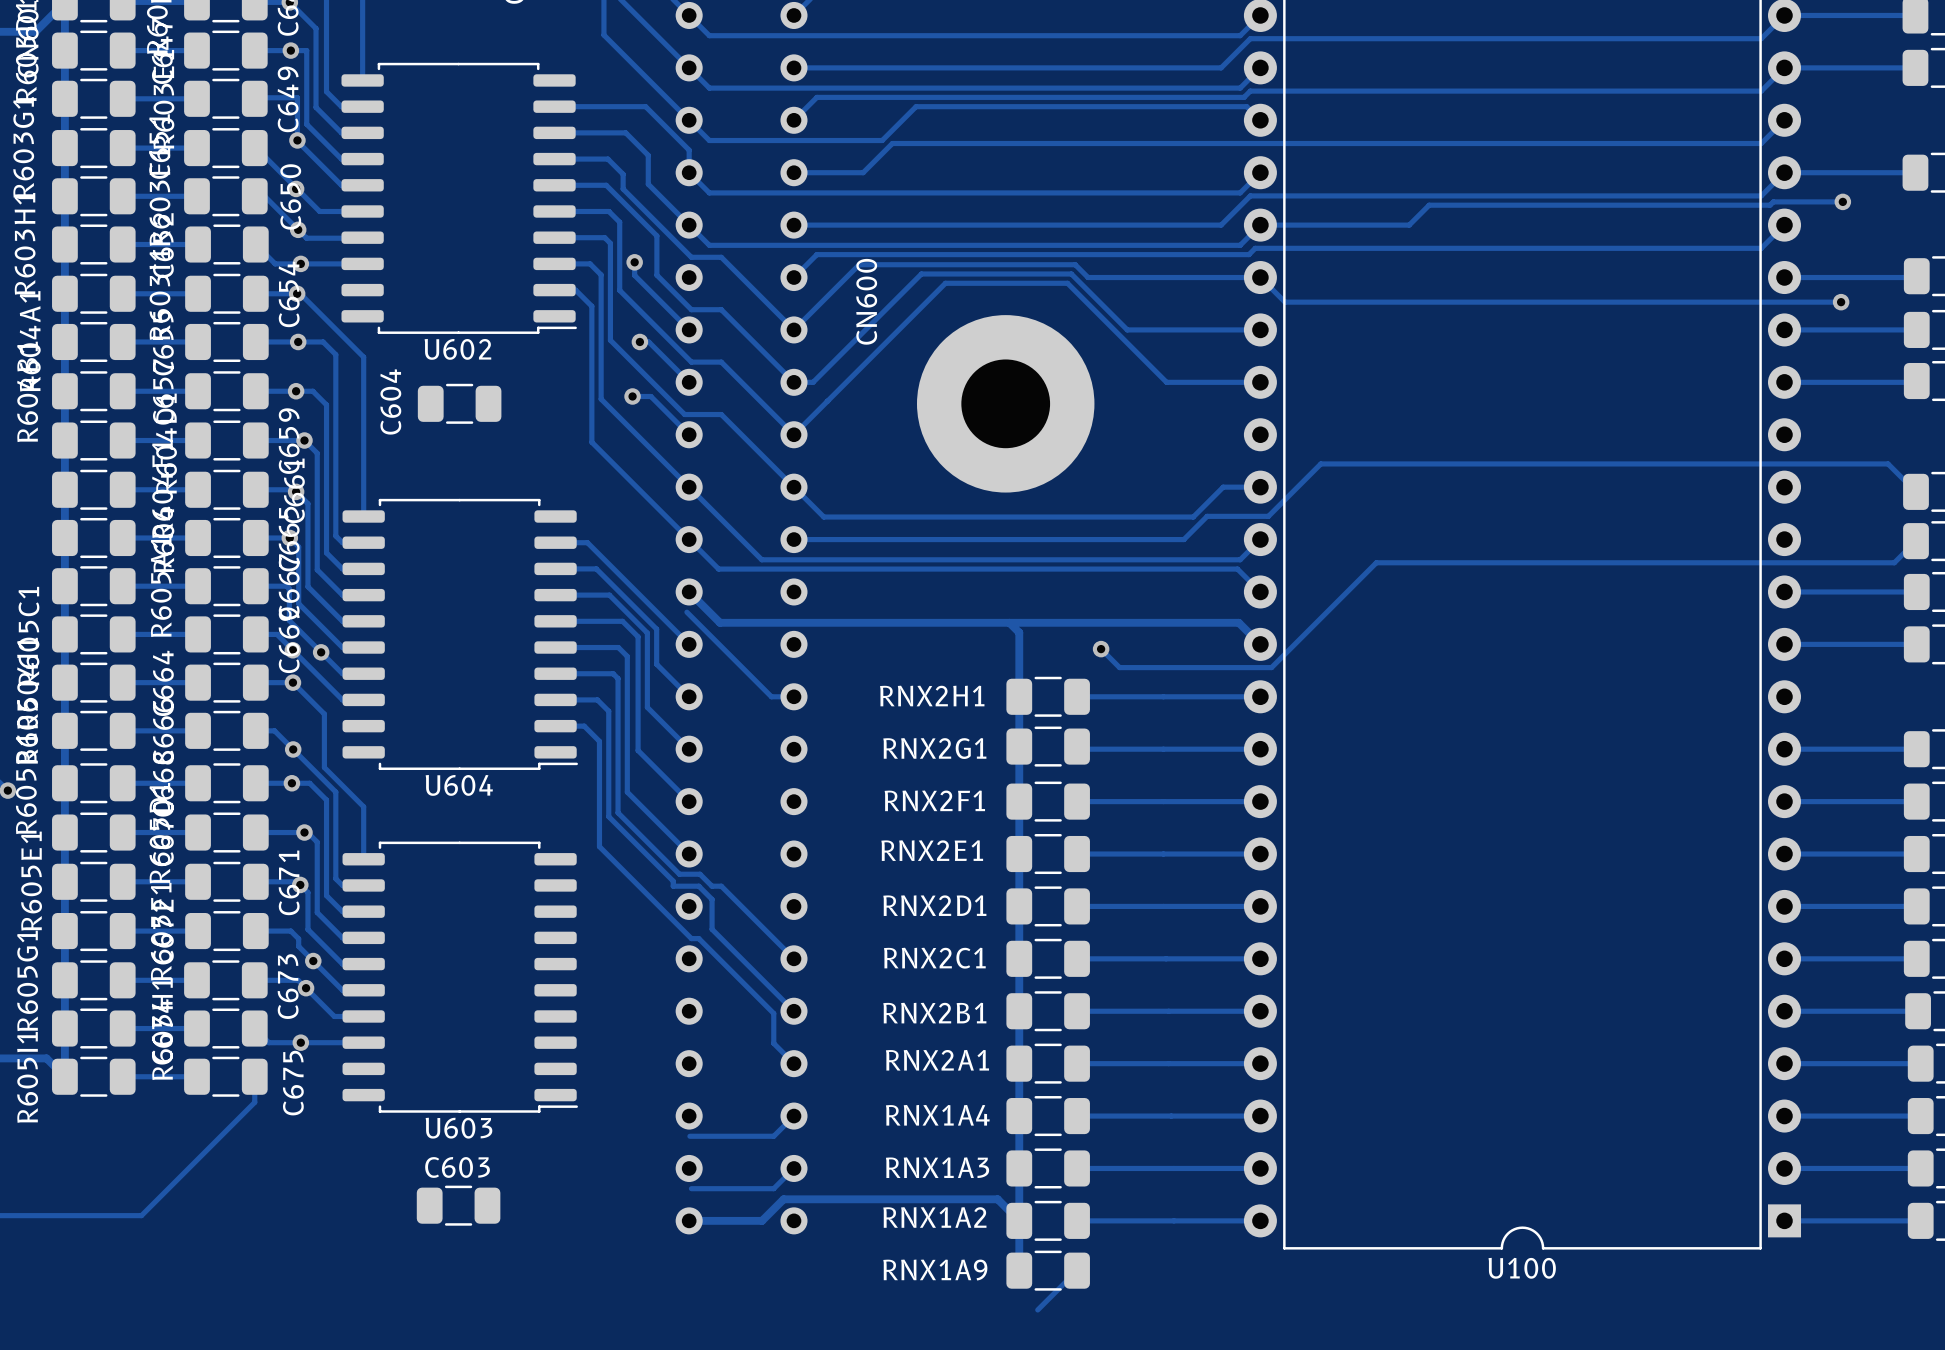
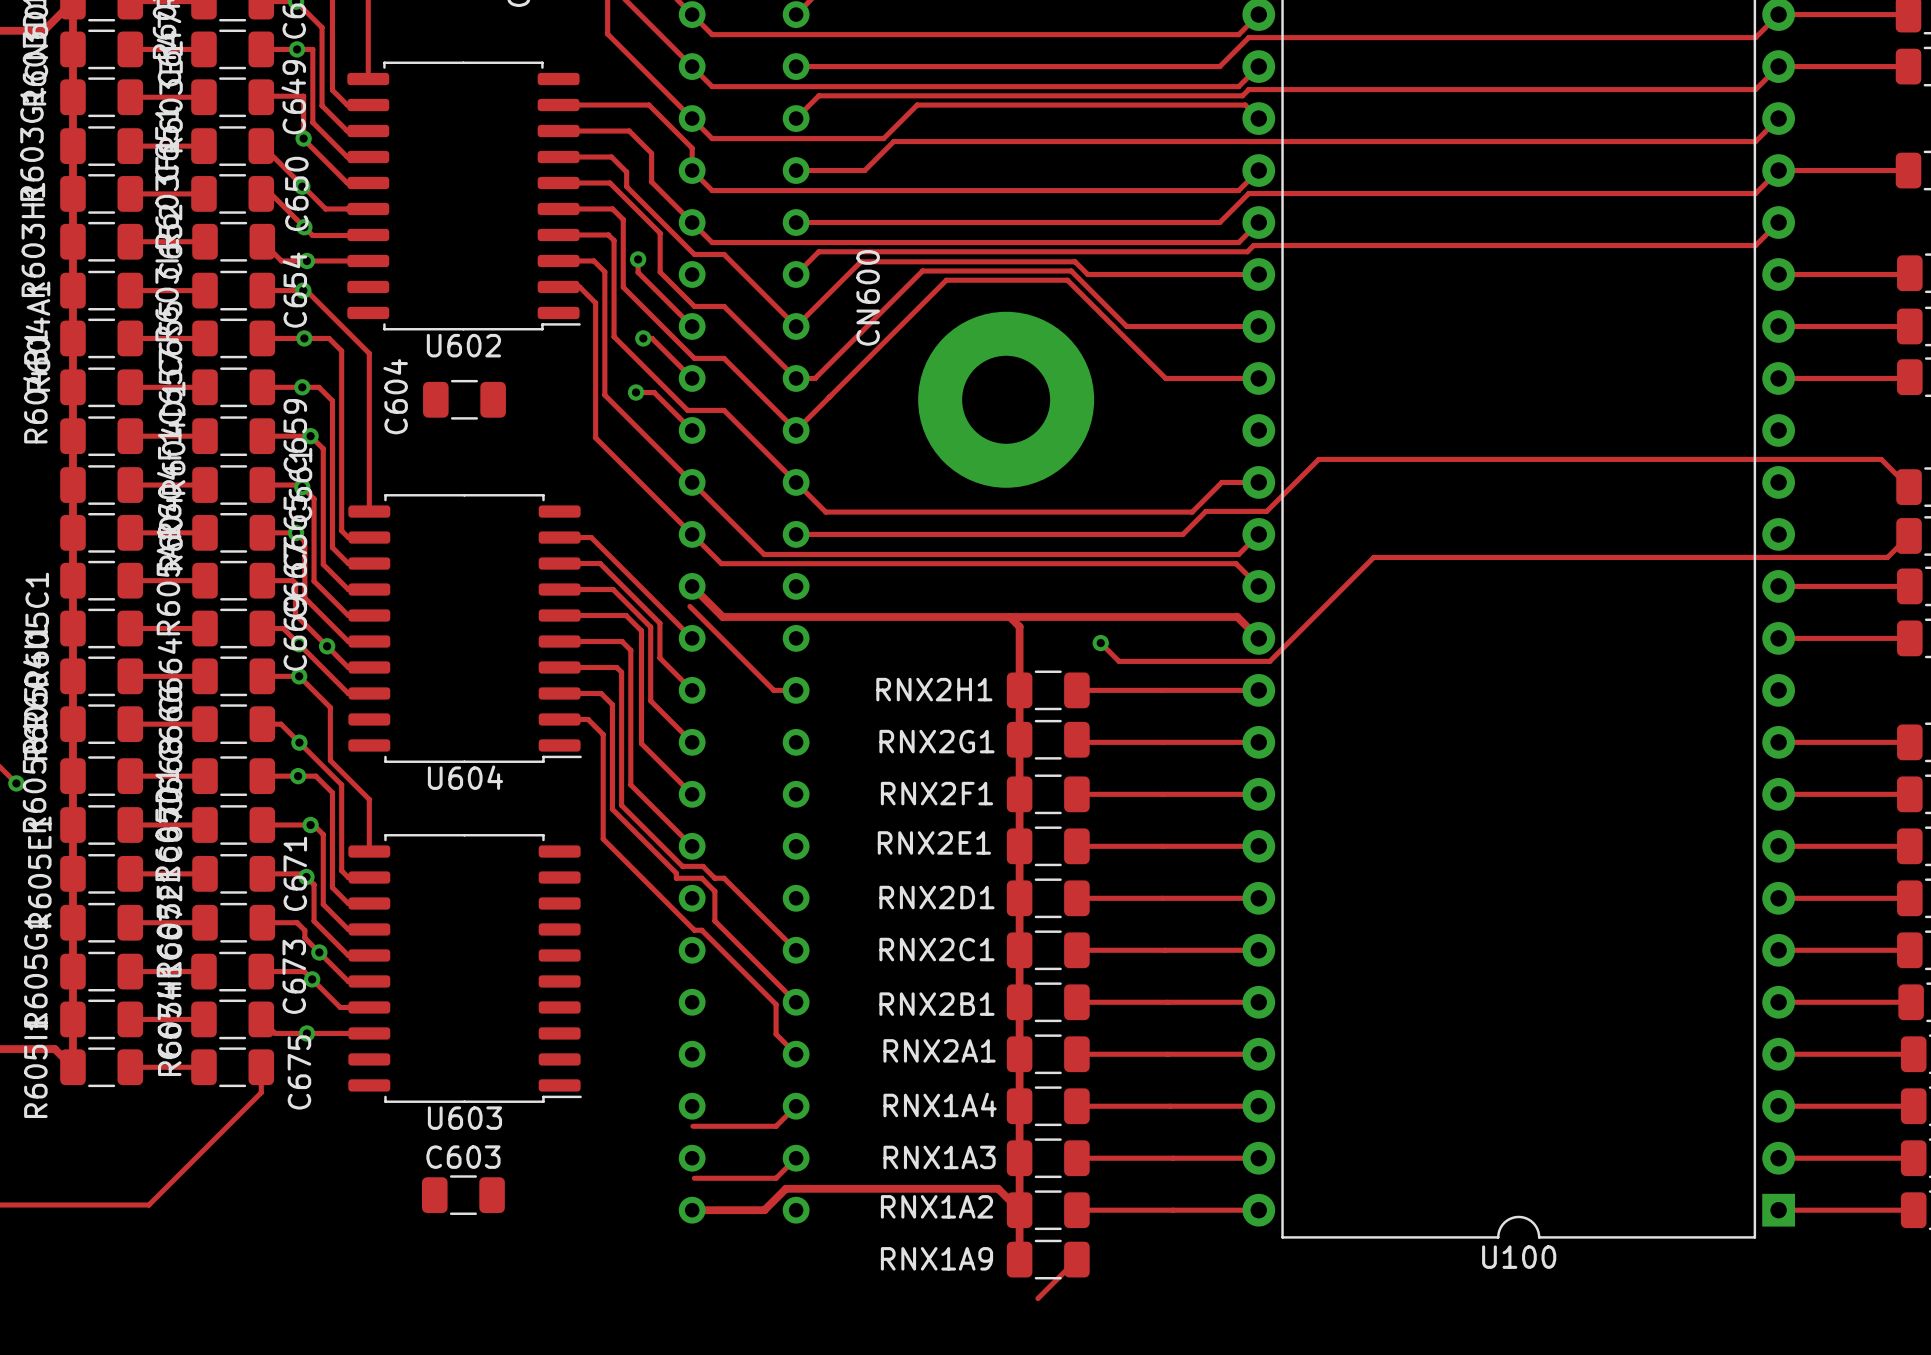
track: (1842, 201) (1773, 201) (1770, 205) (1429, 205) (1409, 225) (1260, 225) -> none
via: (1842, 201) -> none
track: (1260, 277) (1285, 302) (1841, 302) -> none
via: (1841, 302) -> none

